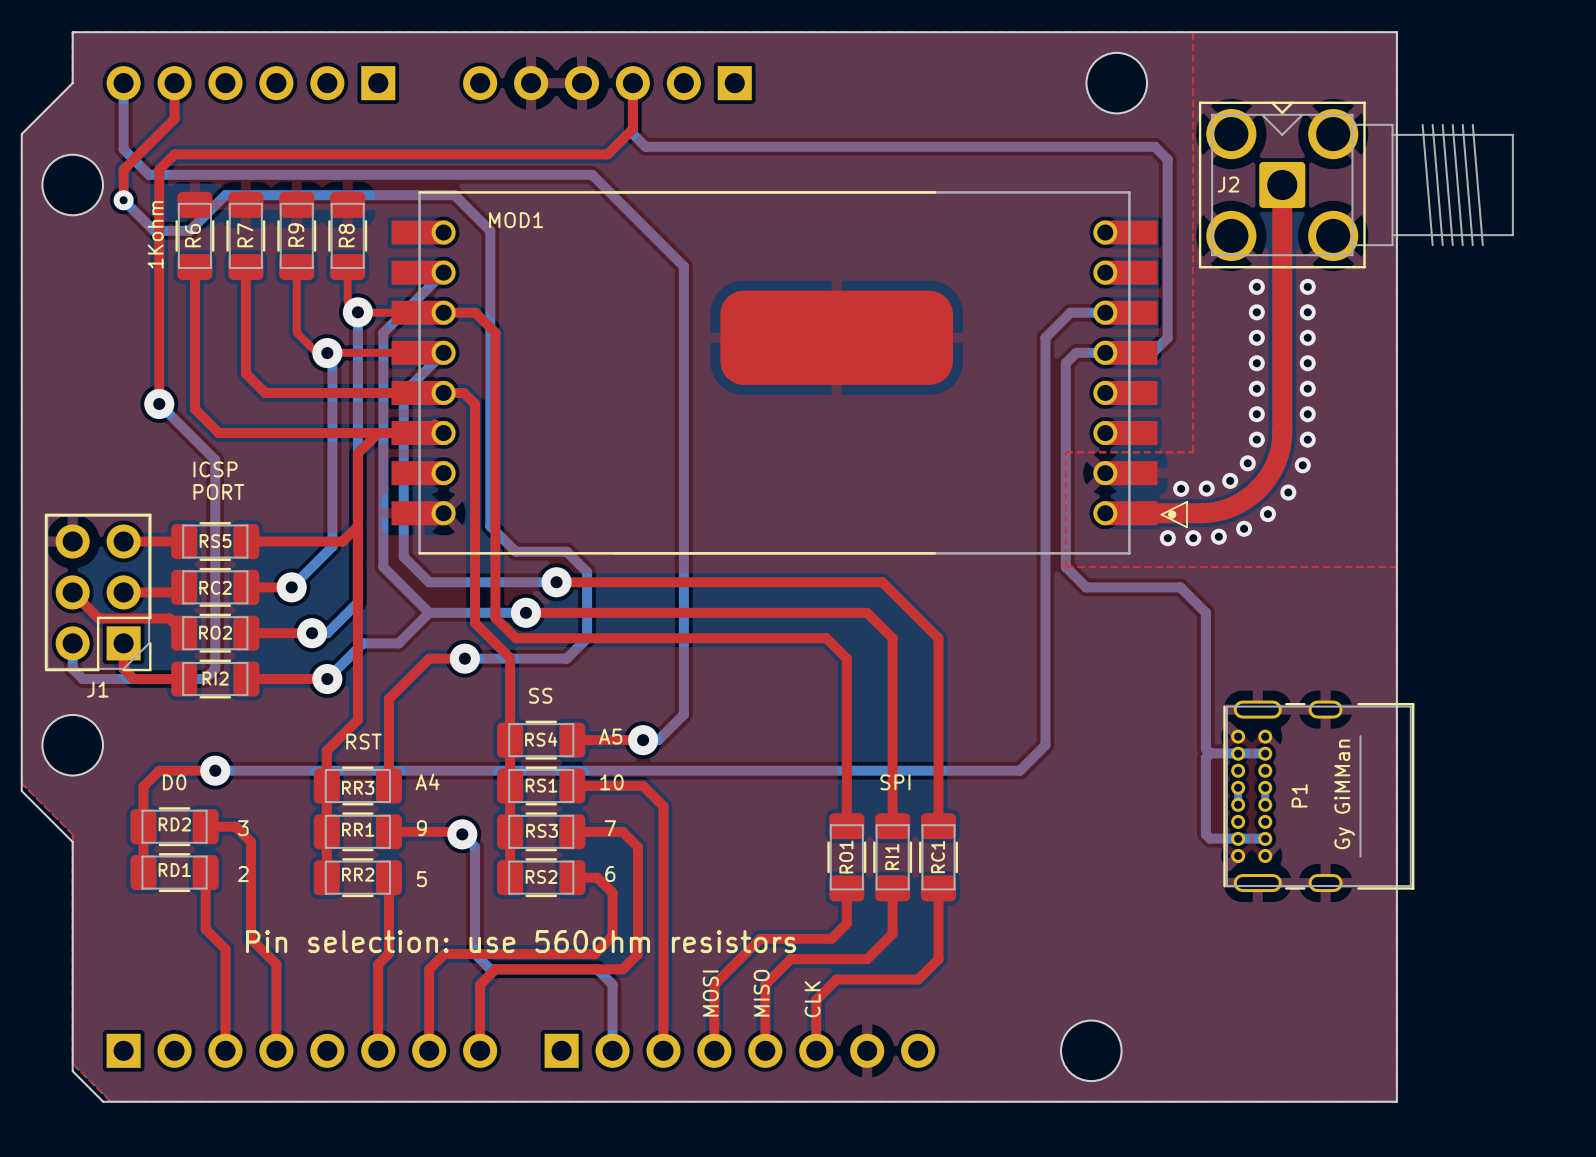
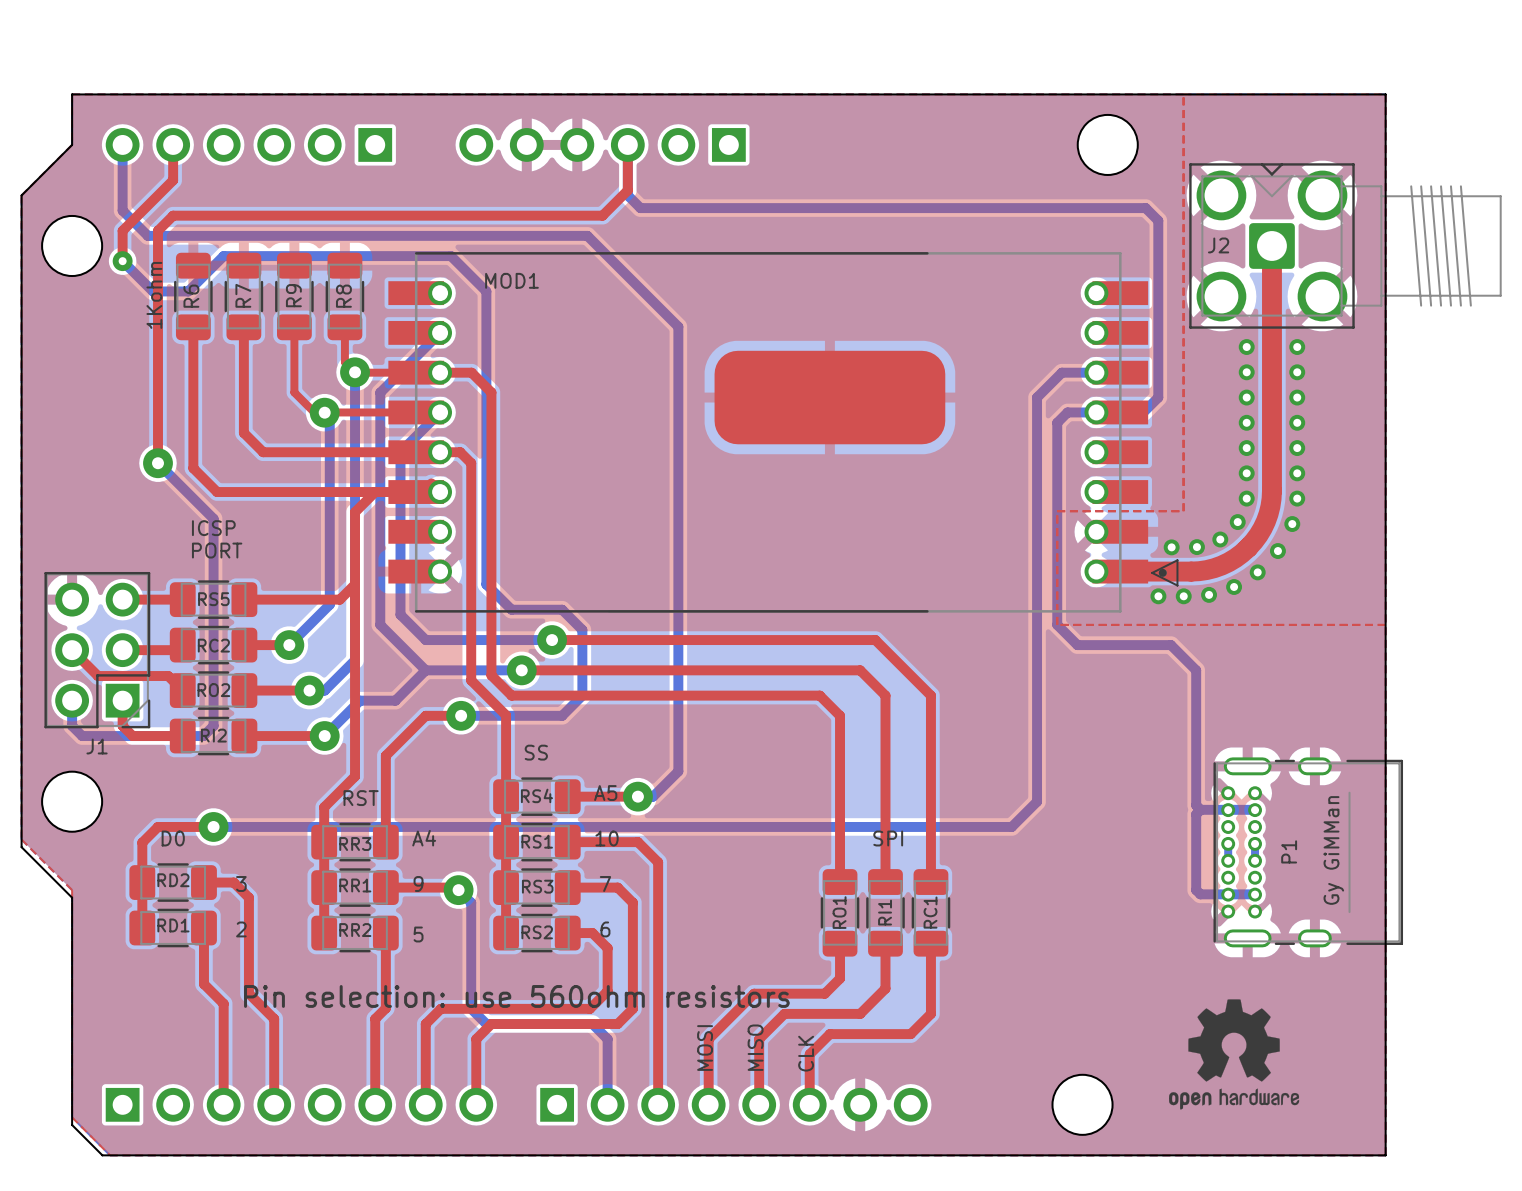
drawing: none -> [1169, 999, 1300, 1110]

